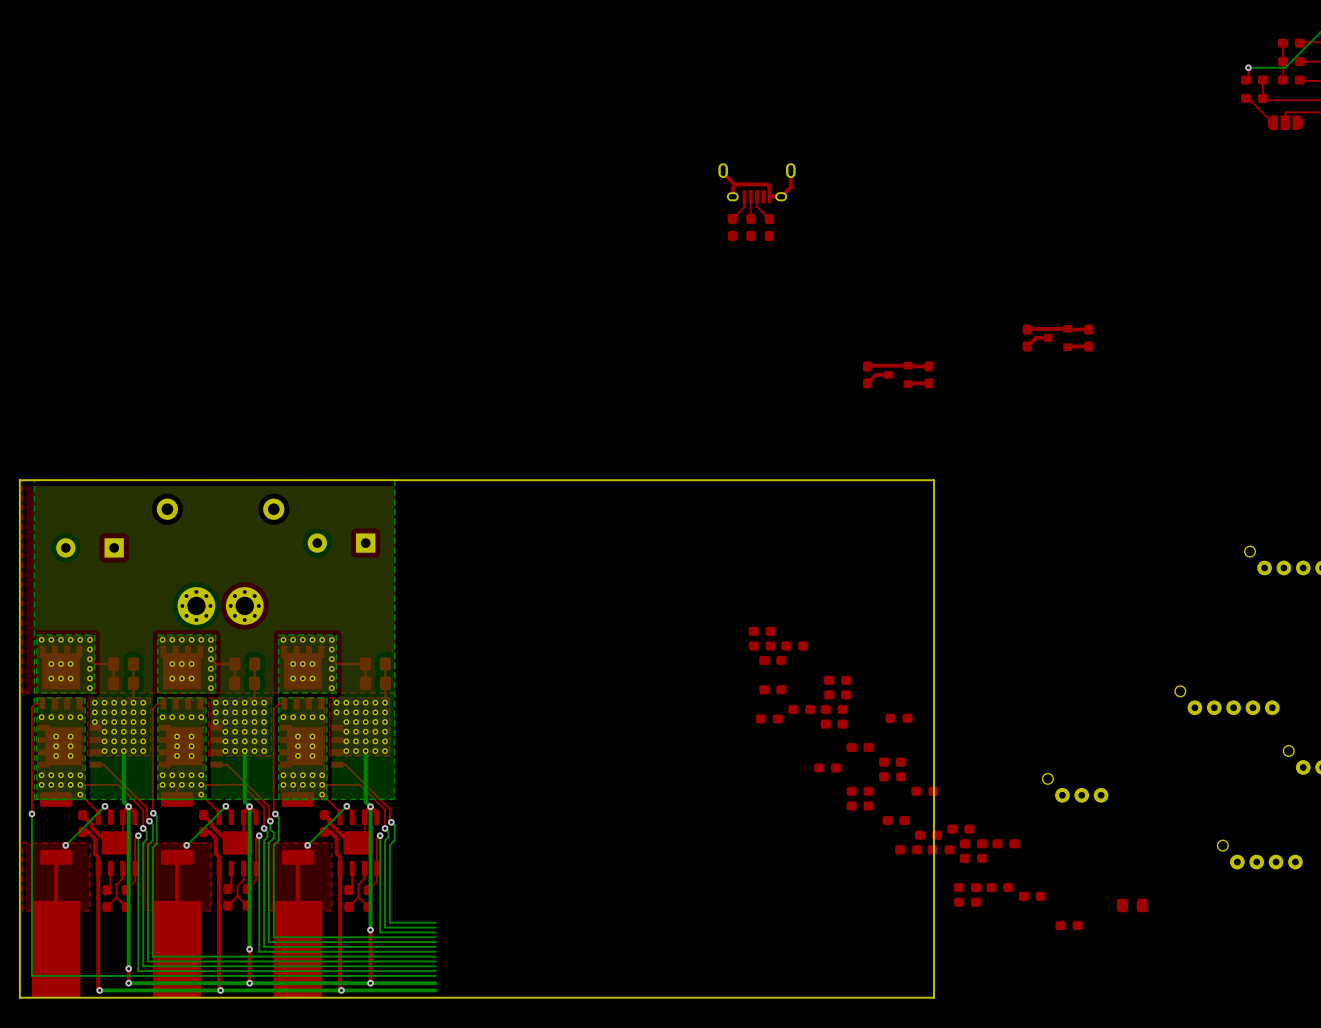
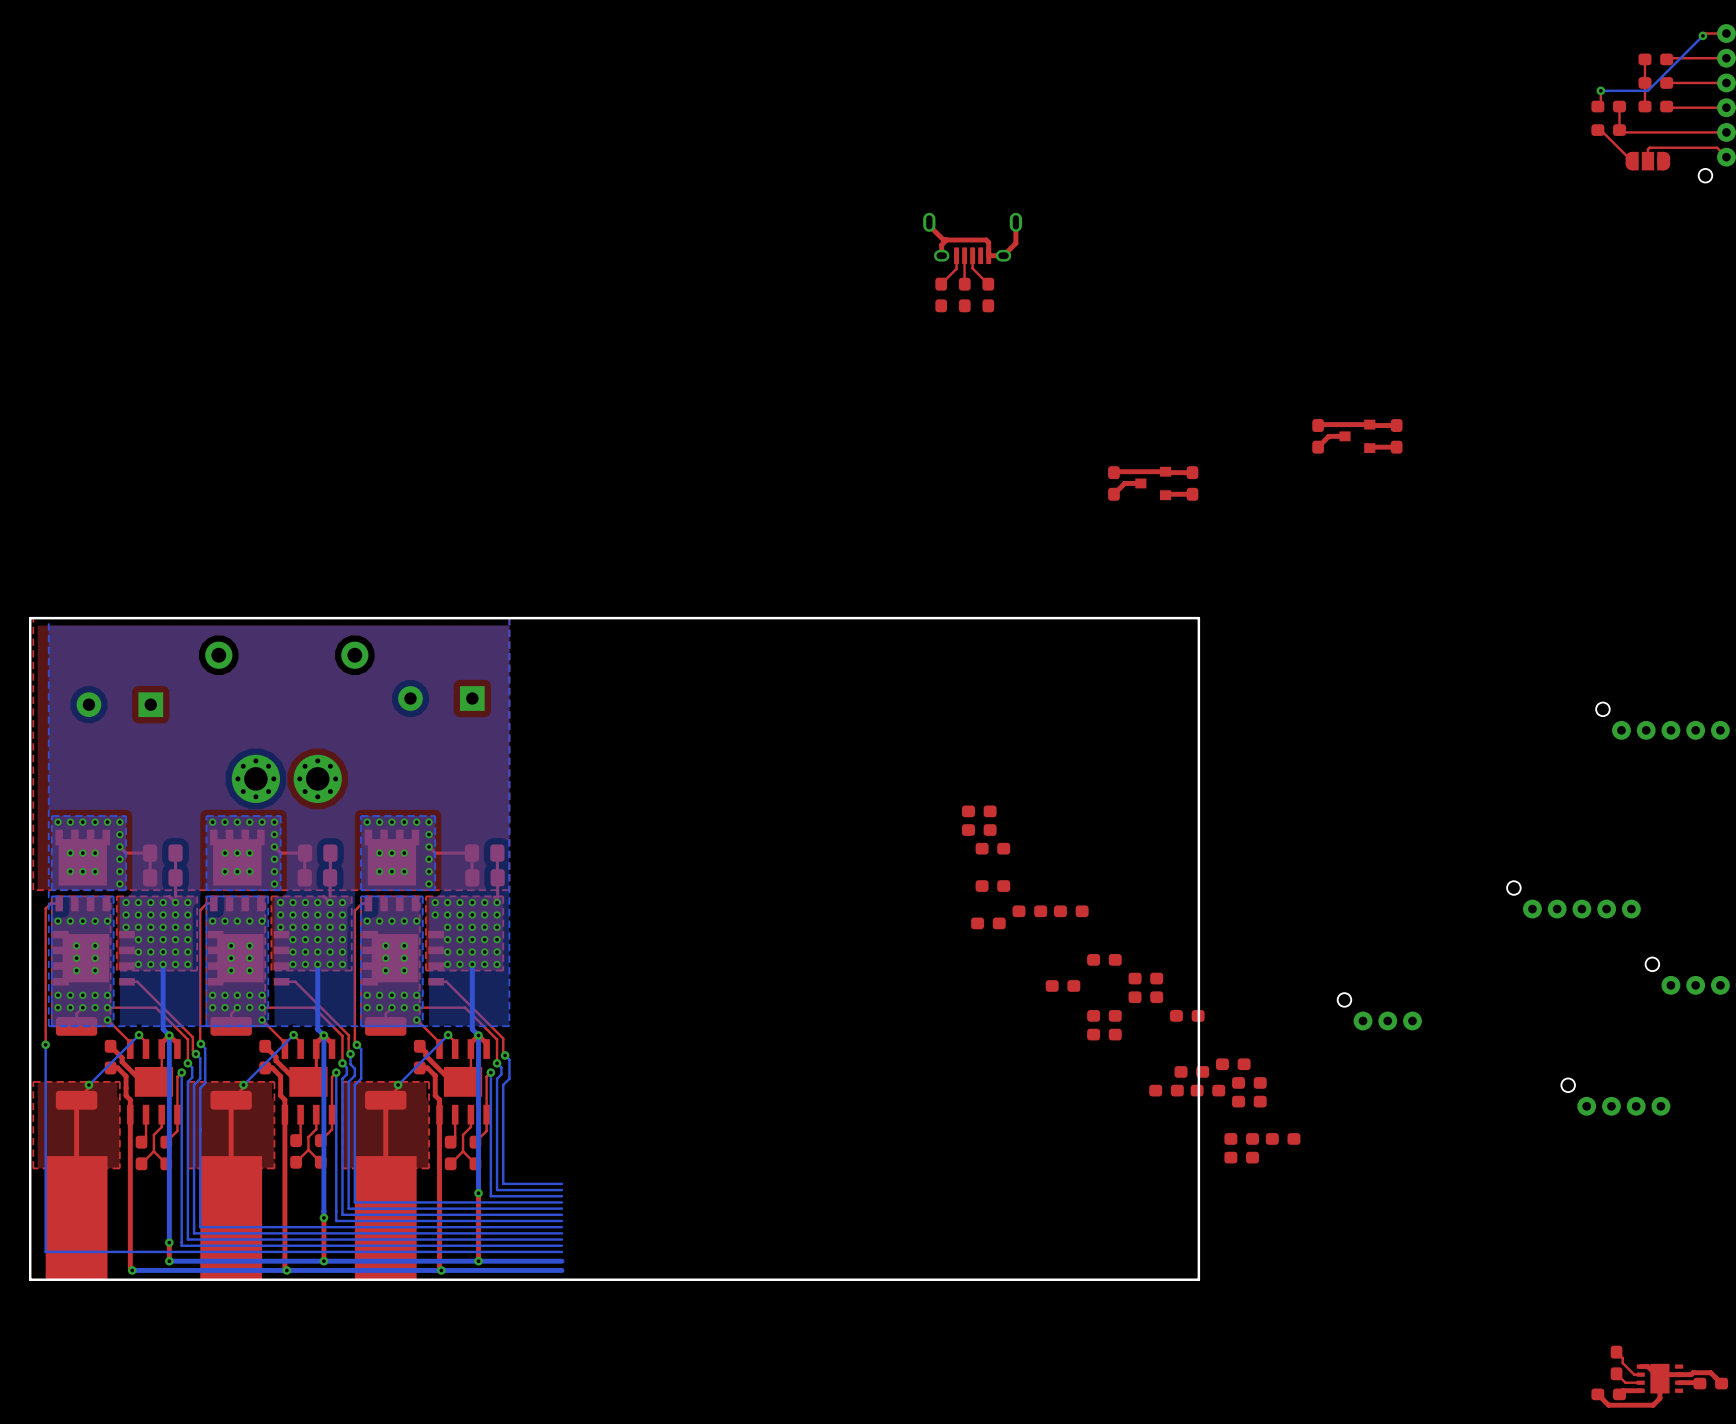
part: (794, 645) -> none
part: (837, 680) -> none
part: (837, 694) -> none
part: (899, 718) -> none
part: (834, 724) -> none
part: (896, 820) -> none
part: (1005, 843) -> none
part: (1032, 896) -> none
part: (1132, 905) -> none
part: (1069, 925) -> none

